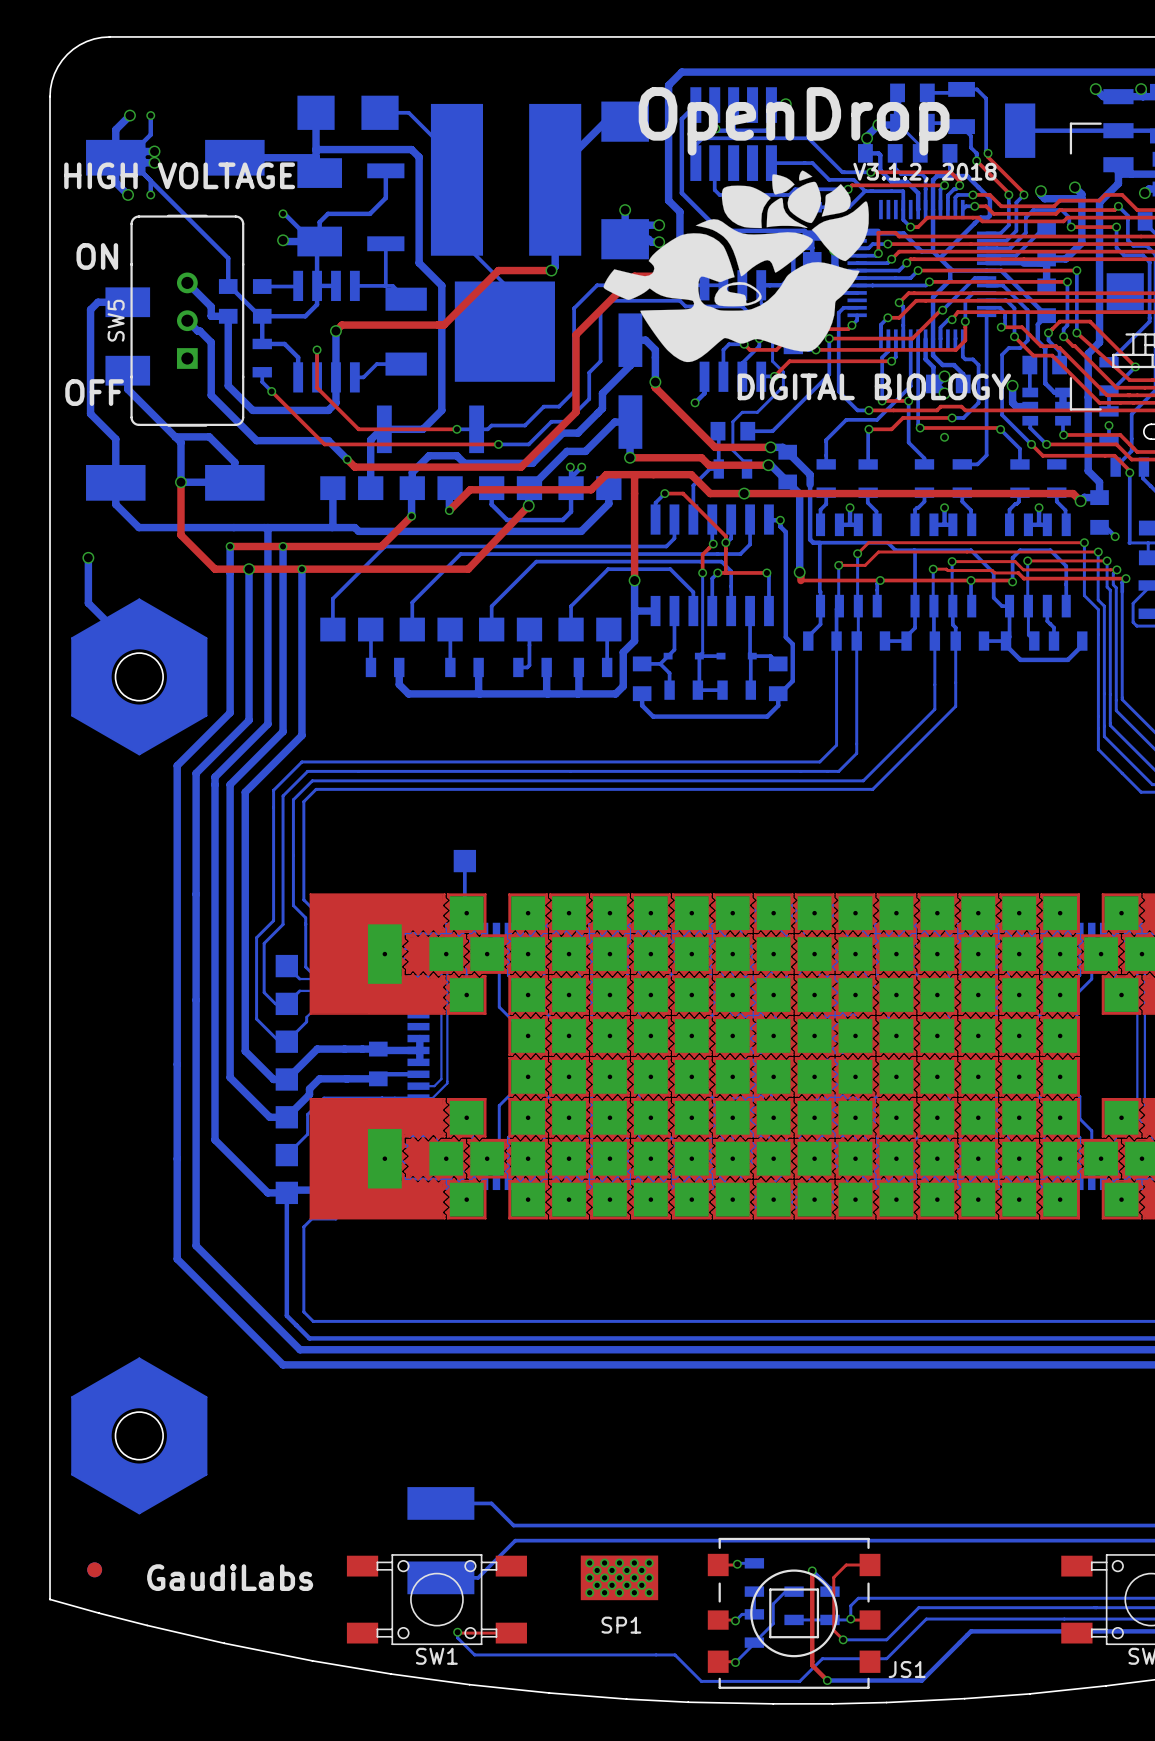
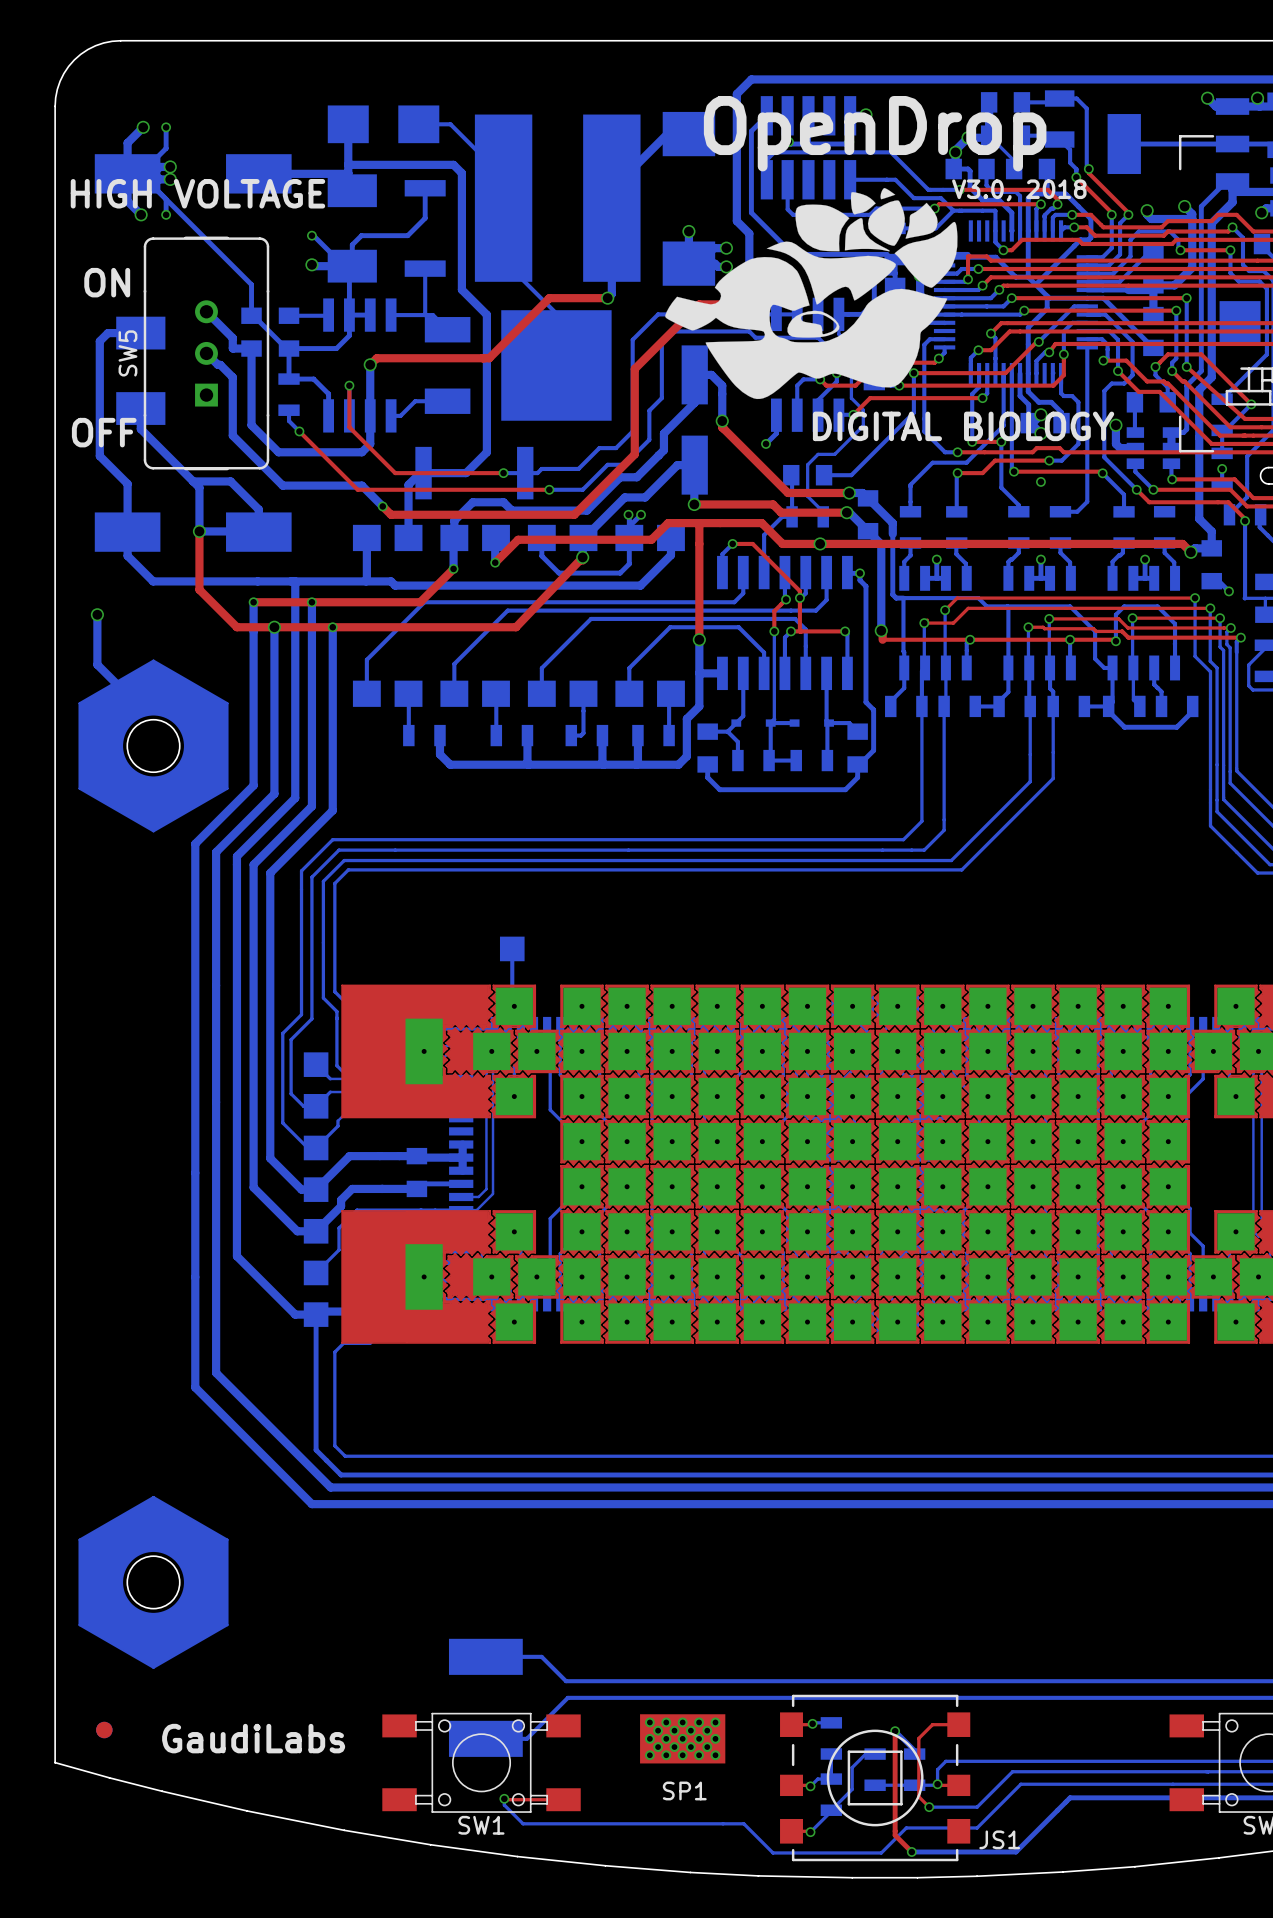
text: V3.1.2, 2018 (924, 172) -> V3.0, 2018 (1019, 190)
bottom track: (1046, 315) (1037, 324) (1037, 340) (1045, 348) (1045, 383) (1054, 392) (1062, 392) -> (1226, 181) (1201, 206) (1201, 371) (1186, 385) (1186, 429) (1183, 432) (1171, 432)

